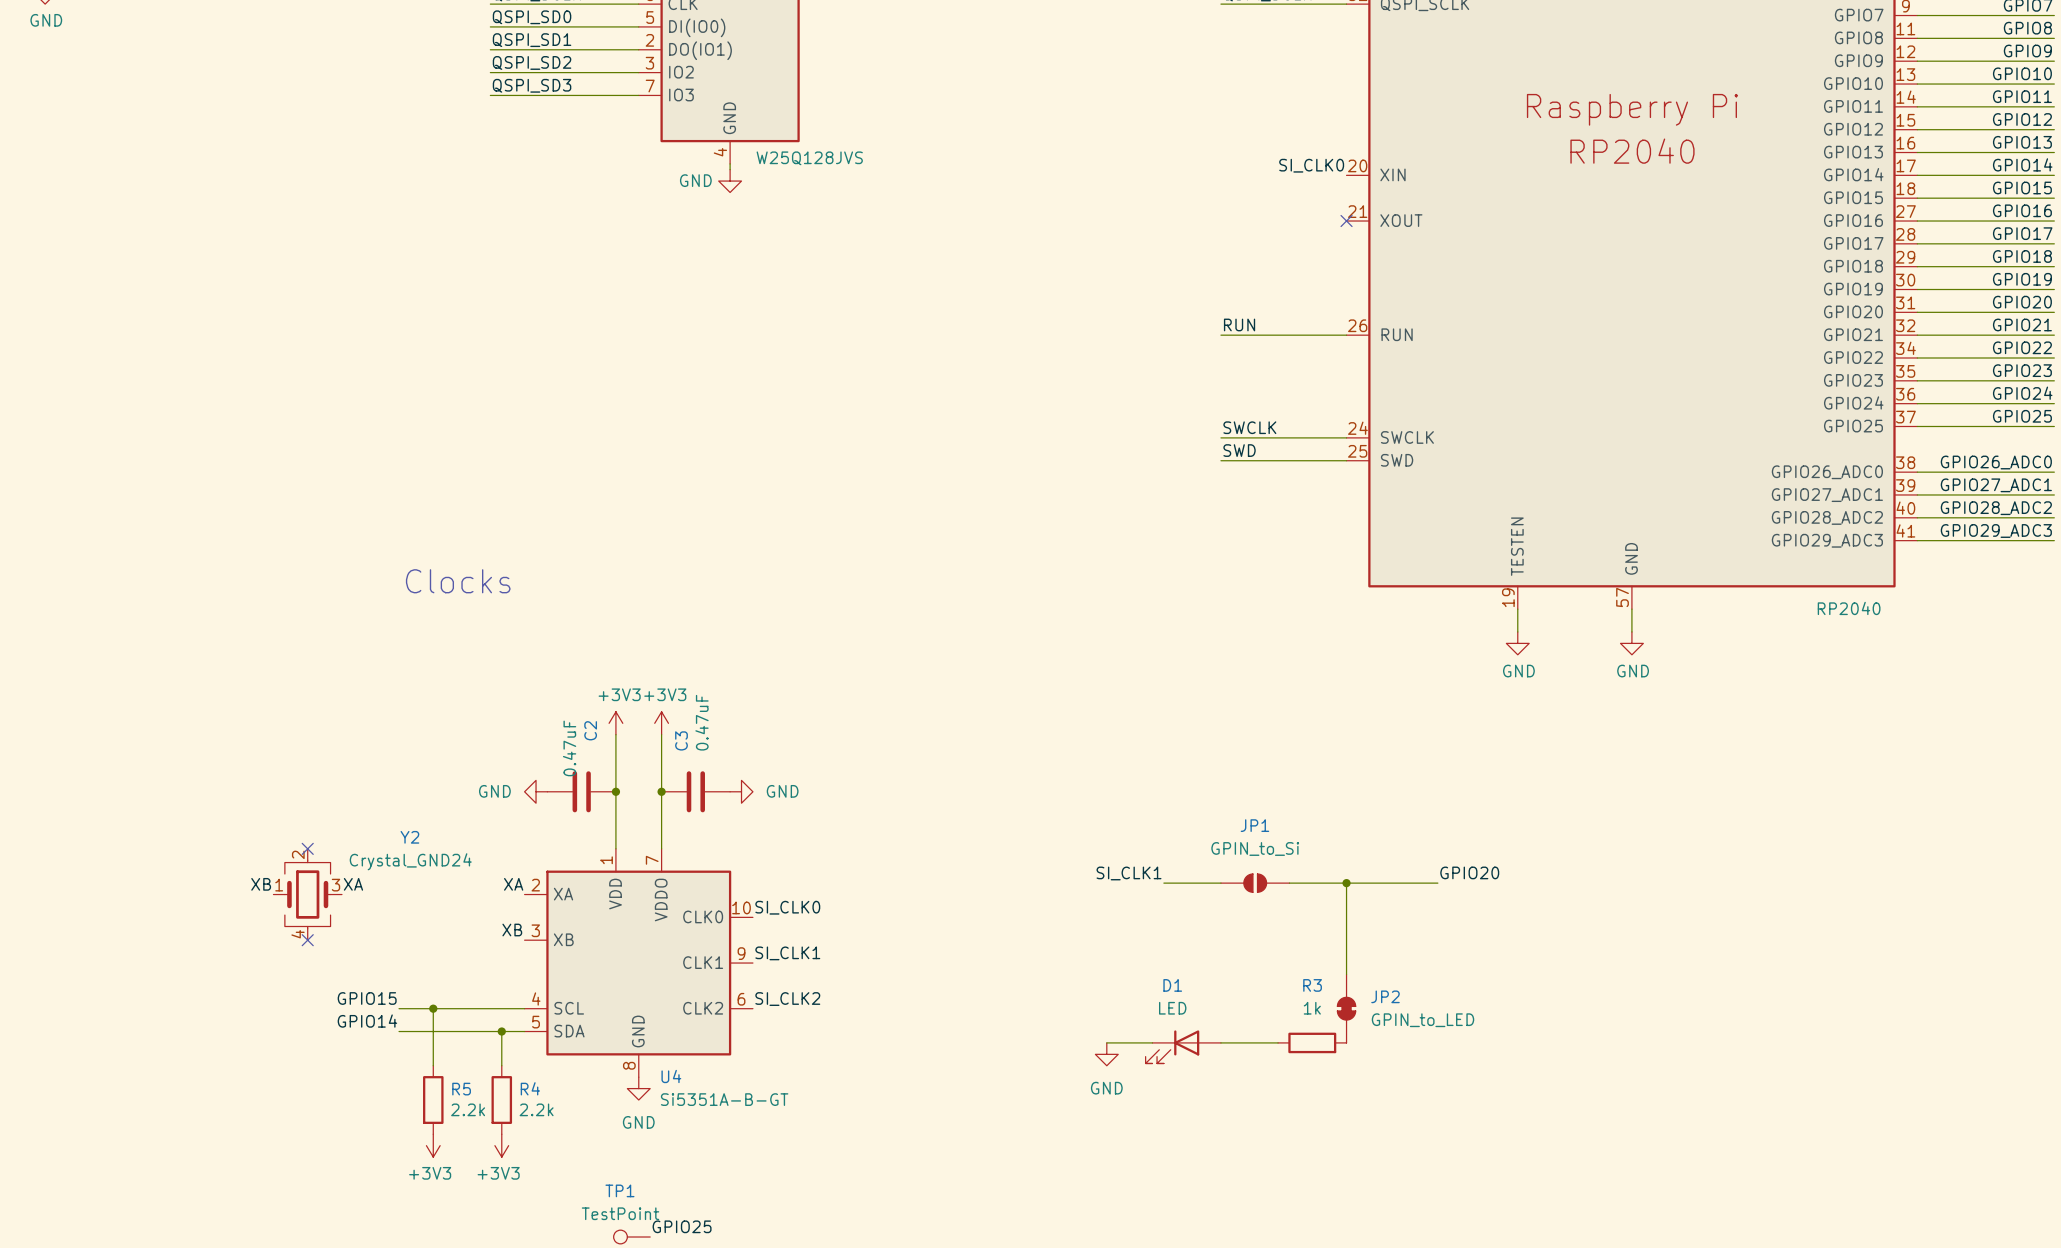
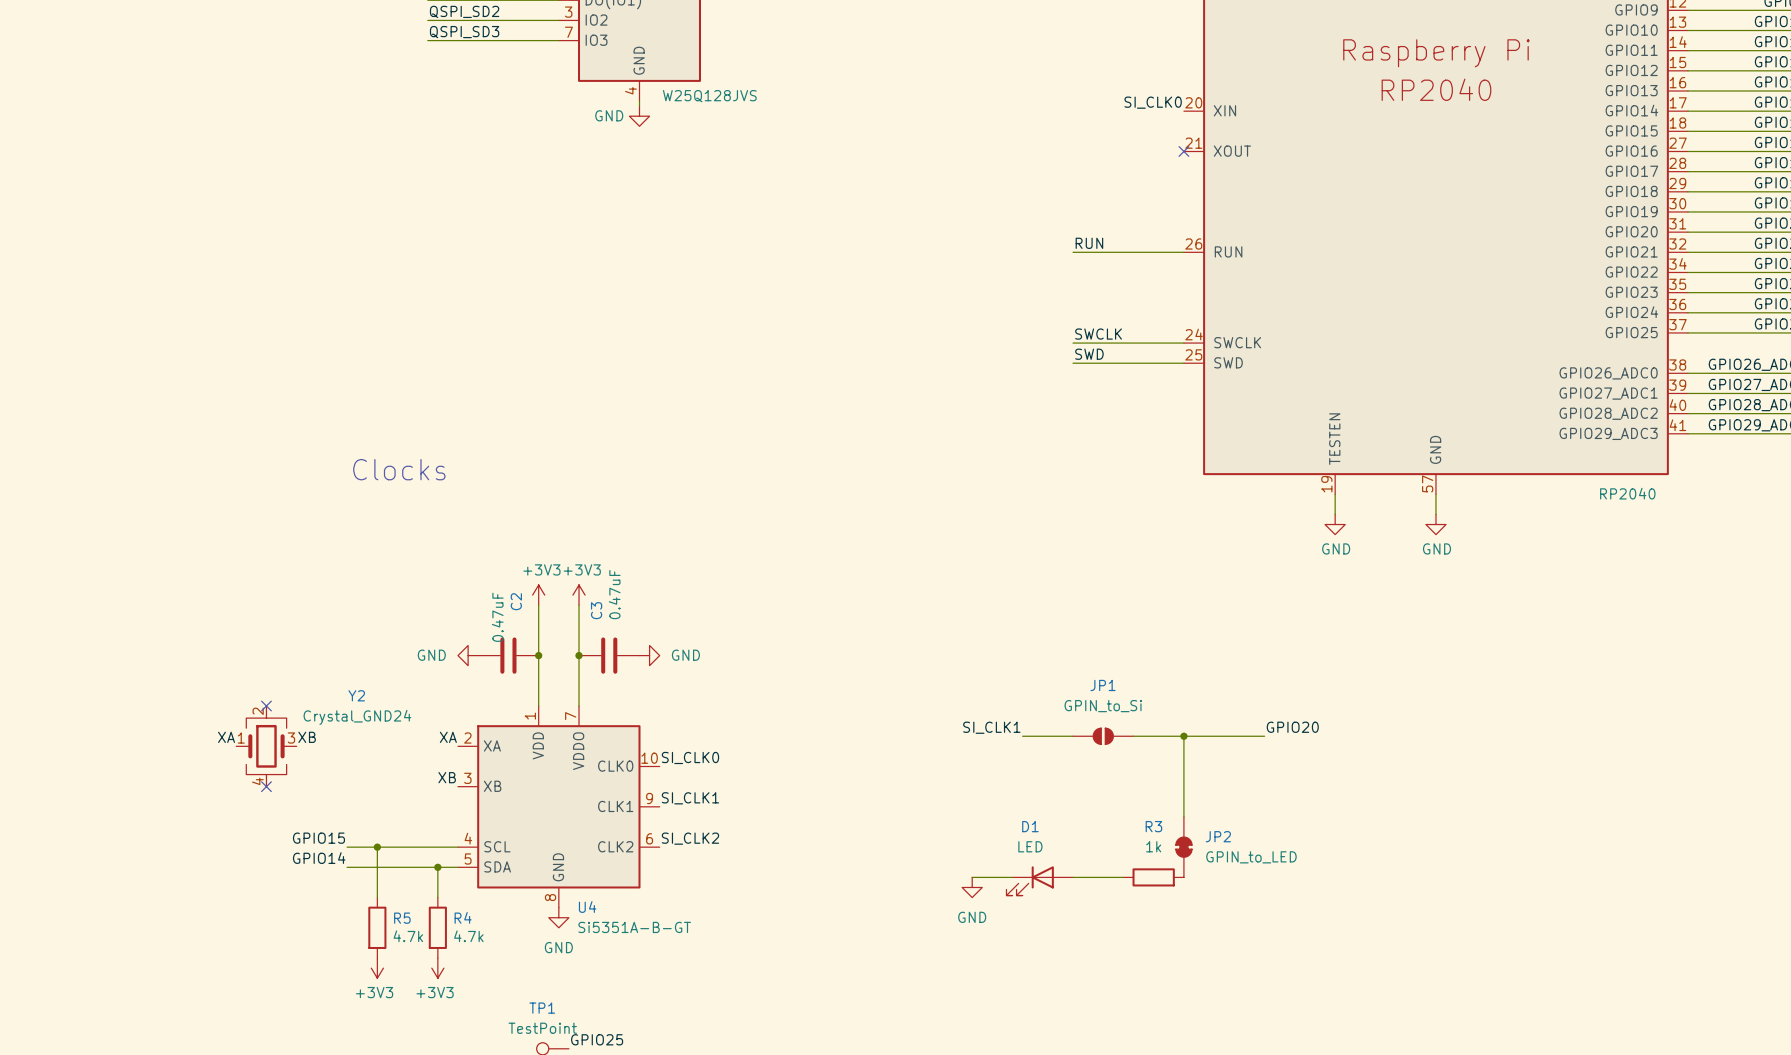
label: XB (261, 884) -> XA (226, 737)
label: XA (353, 884) -> XB (307, 737)
R5 value: 2.2k (468, 1109) -> 4.7k (408, 936)
R4 value: 2.2k (536, 1109) -> 4.7k (468, 936)

